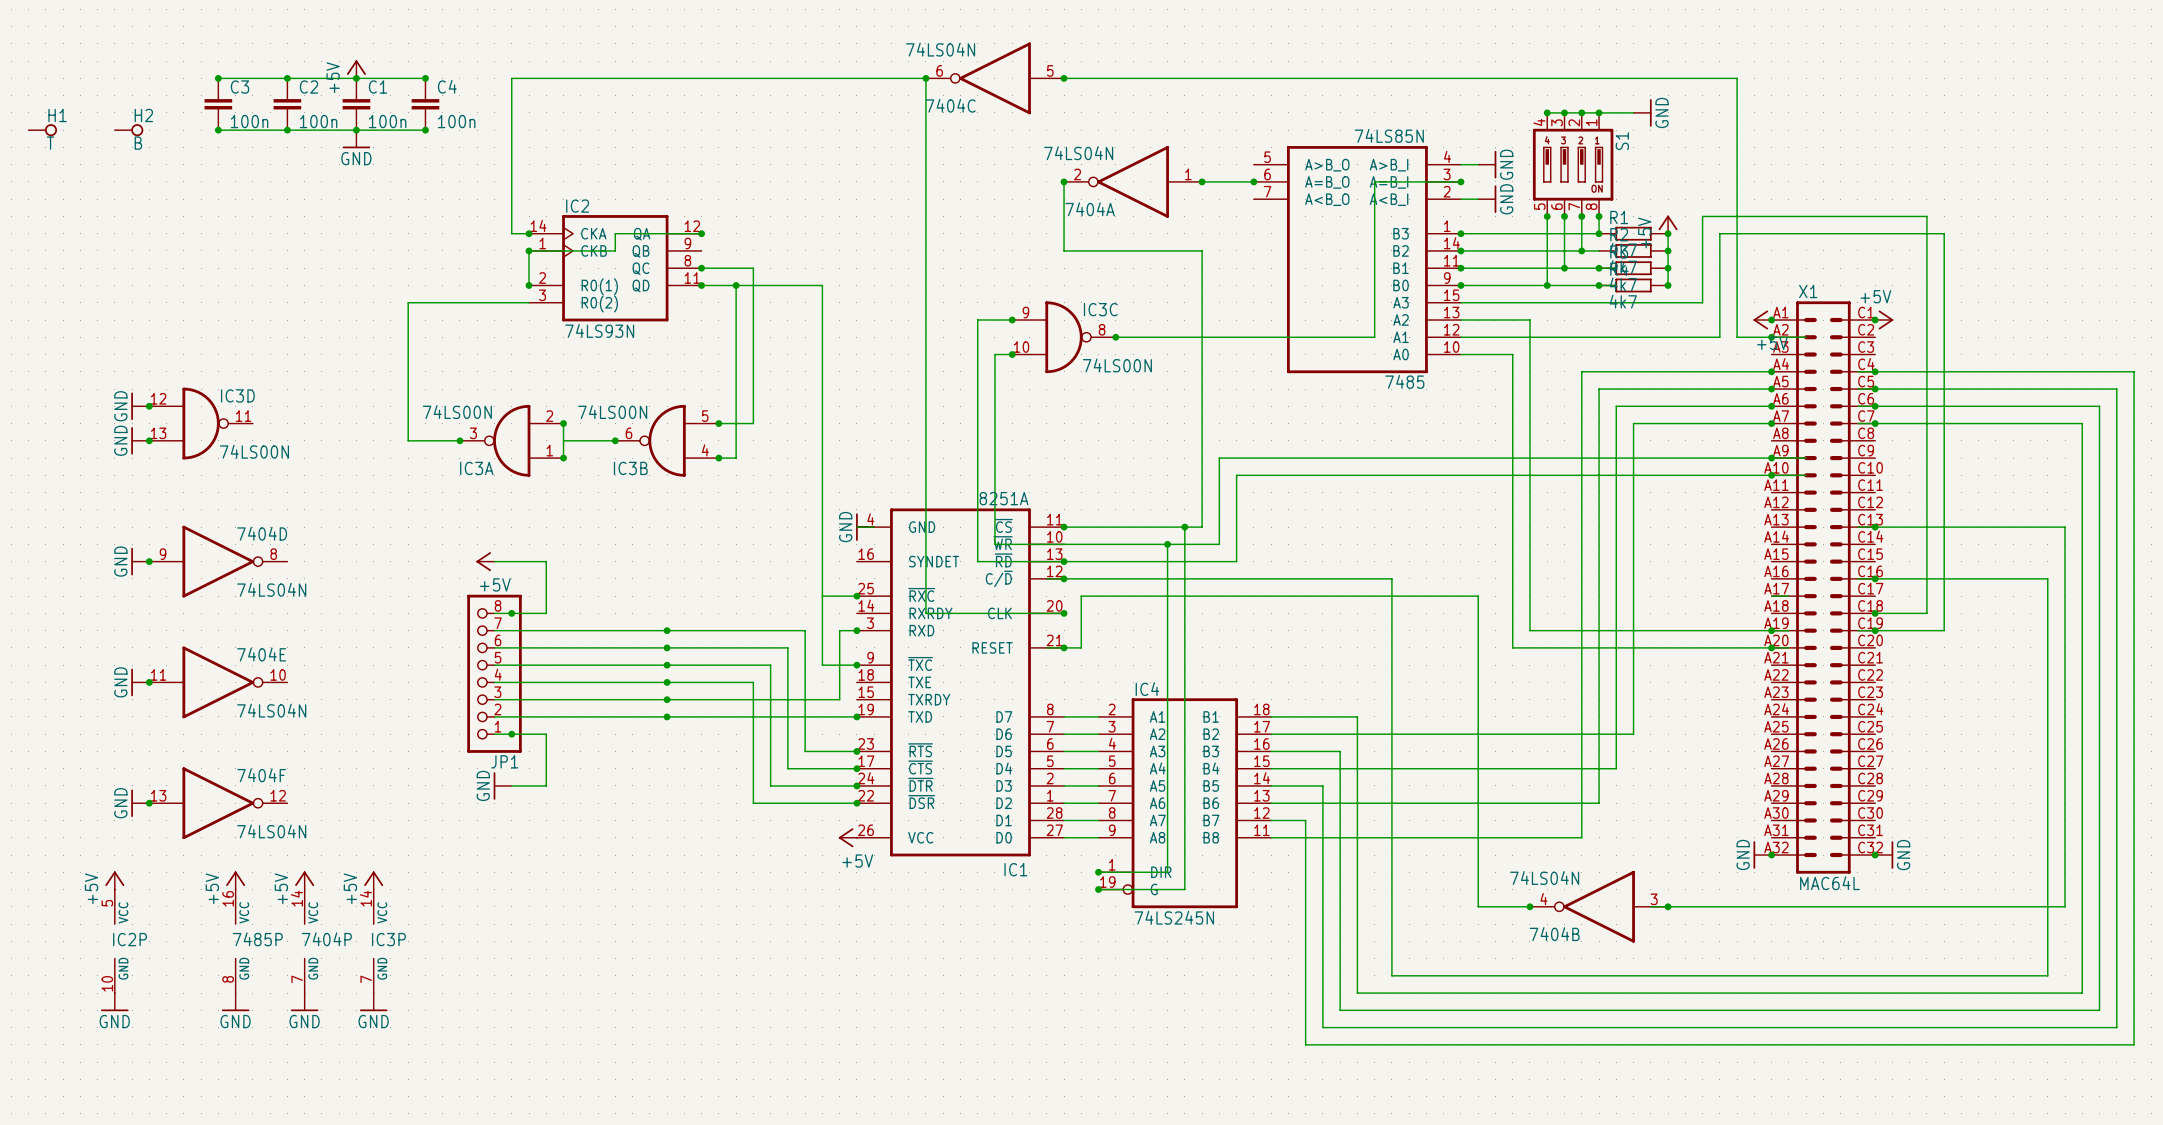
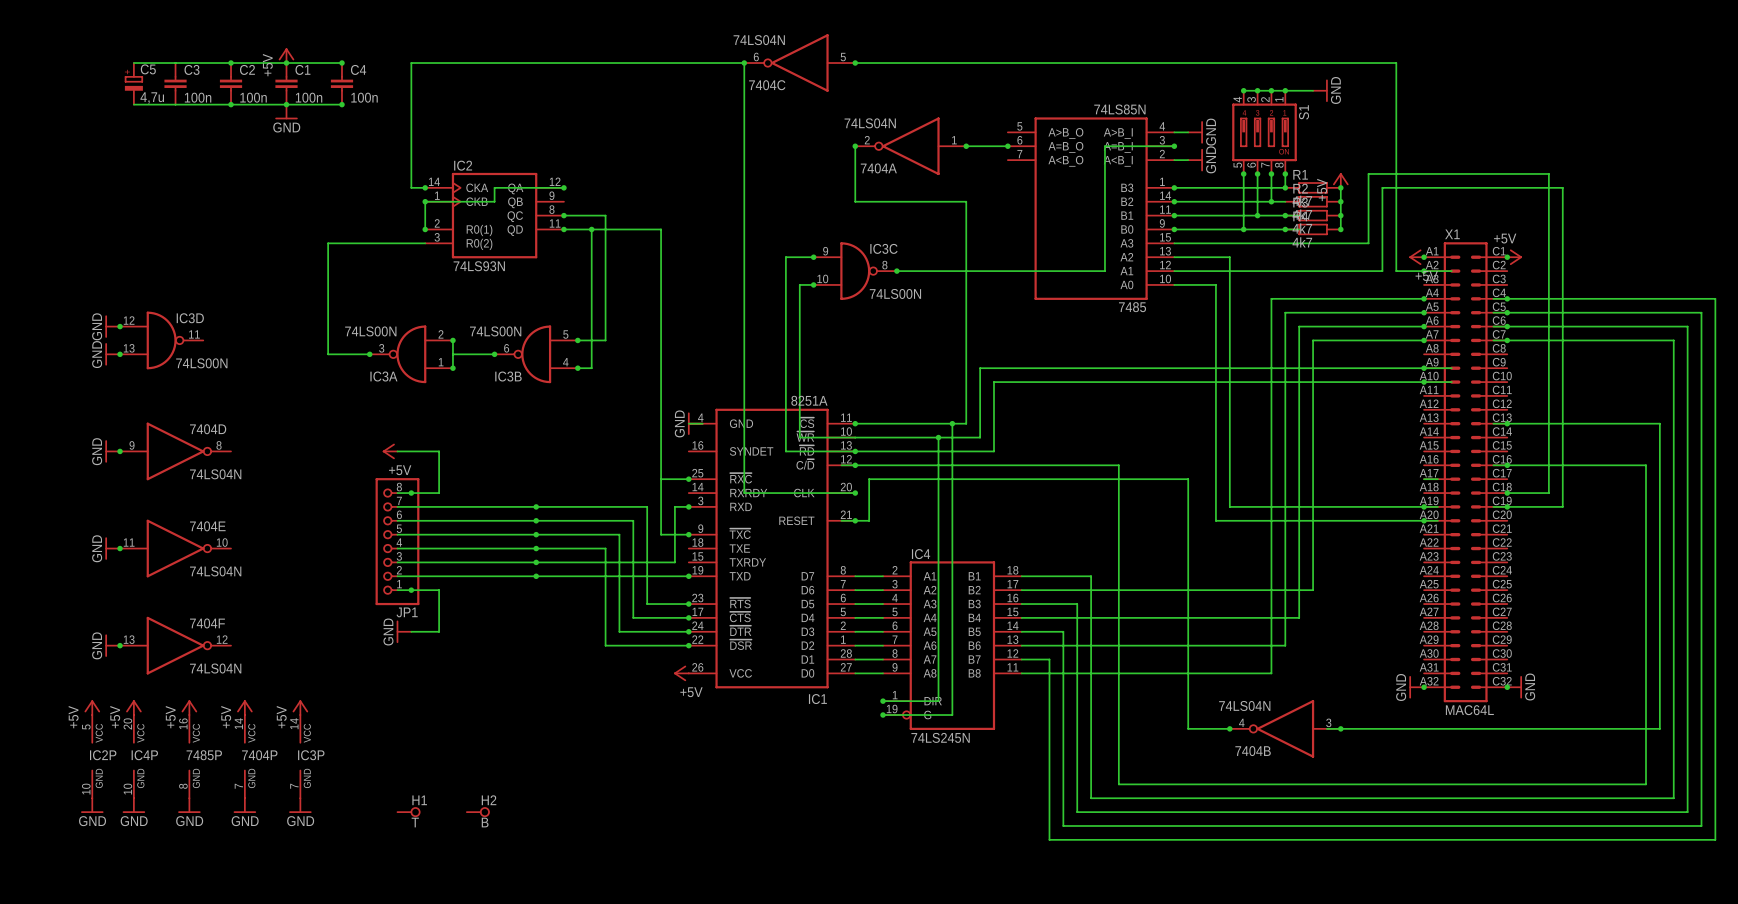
wire: none -> (133, 63) (175, 63)
junction: (218, 78) -> none
C5: none -> 4,7u (133, 83)
H1 position: (42, 130) -> (408, 812)
H2 position: (129, 130) -> (478, 812)
wire: none -> (133, 104) (175, 104)
junction: (218, 130) -> none
power symbol: none -> +5V (133, 707)
IC4P: none -> (133, 756)
power symbol: none -> GND (133, 805)

